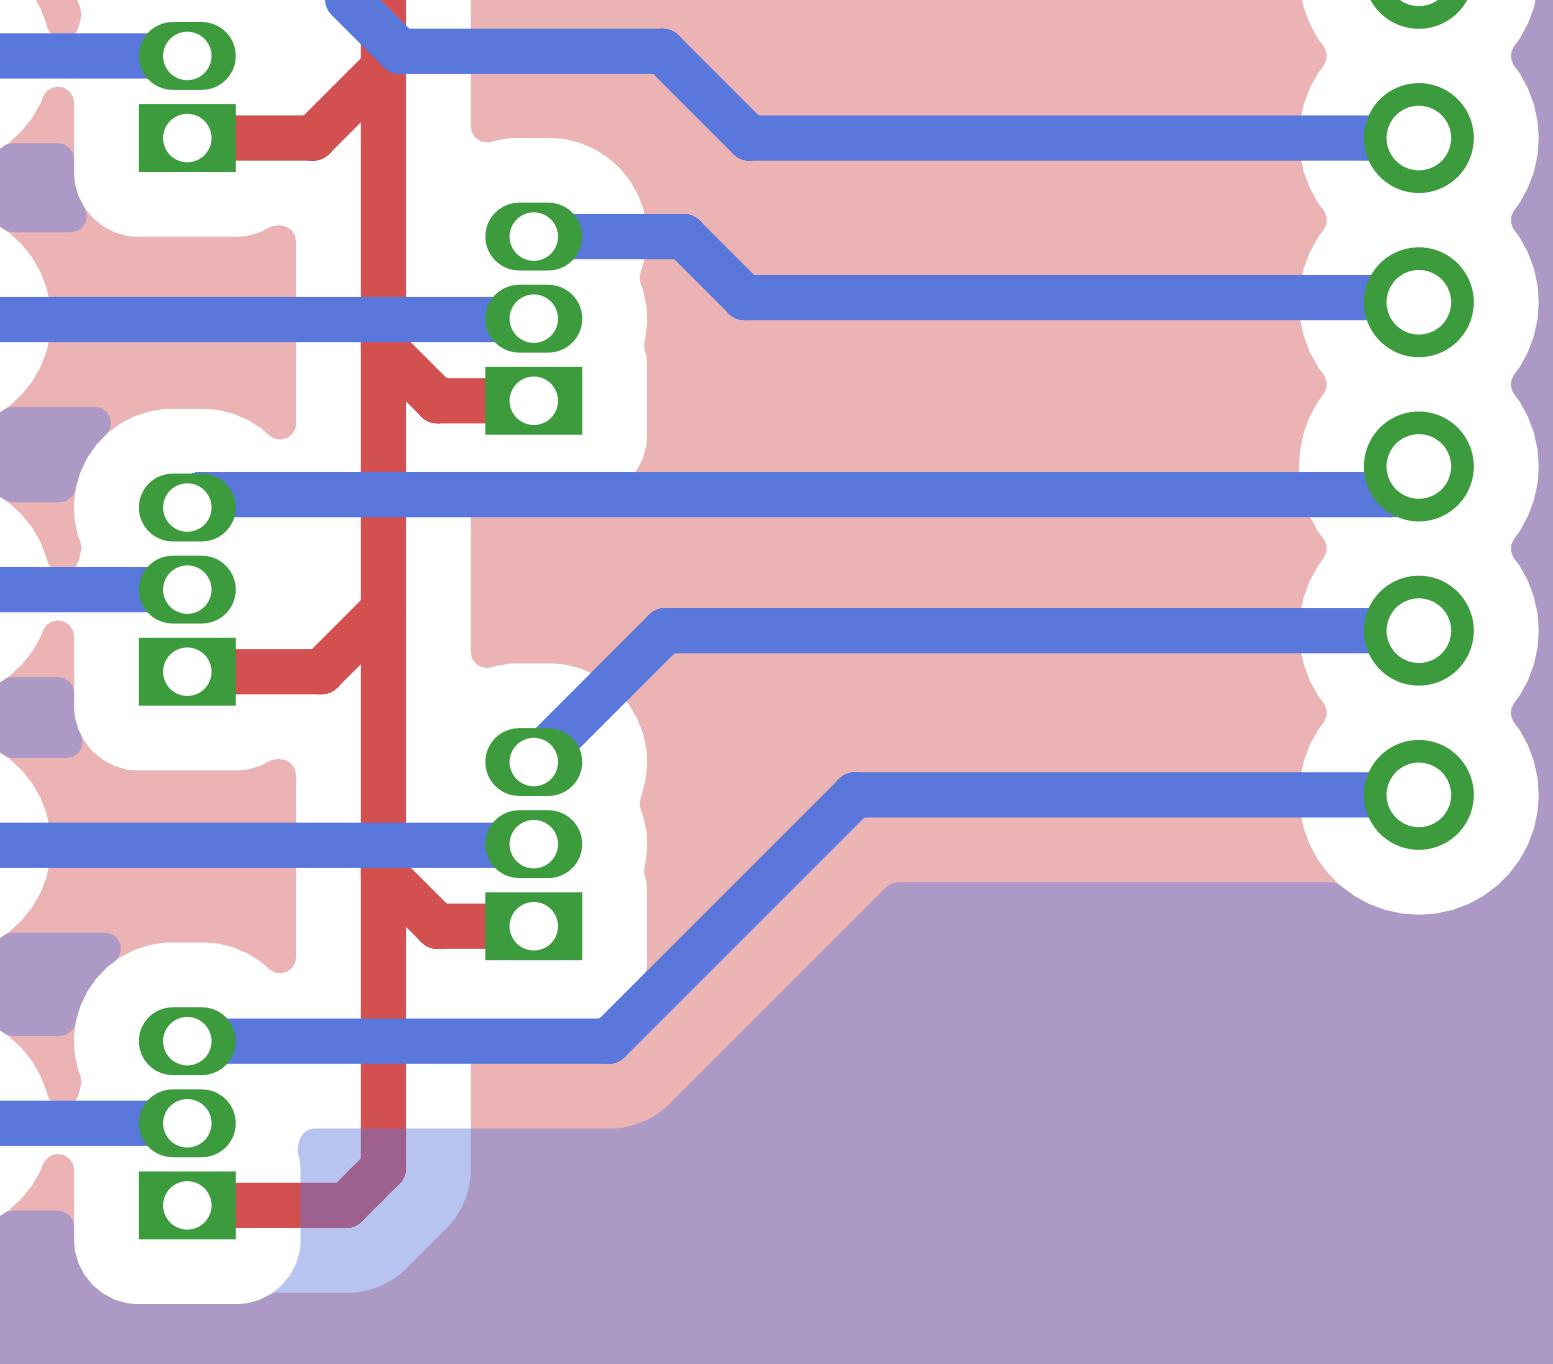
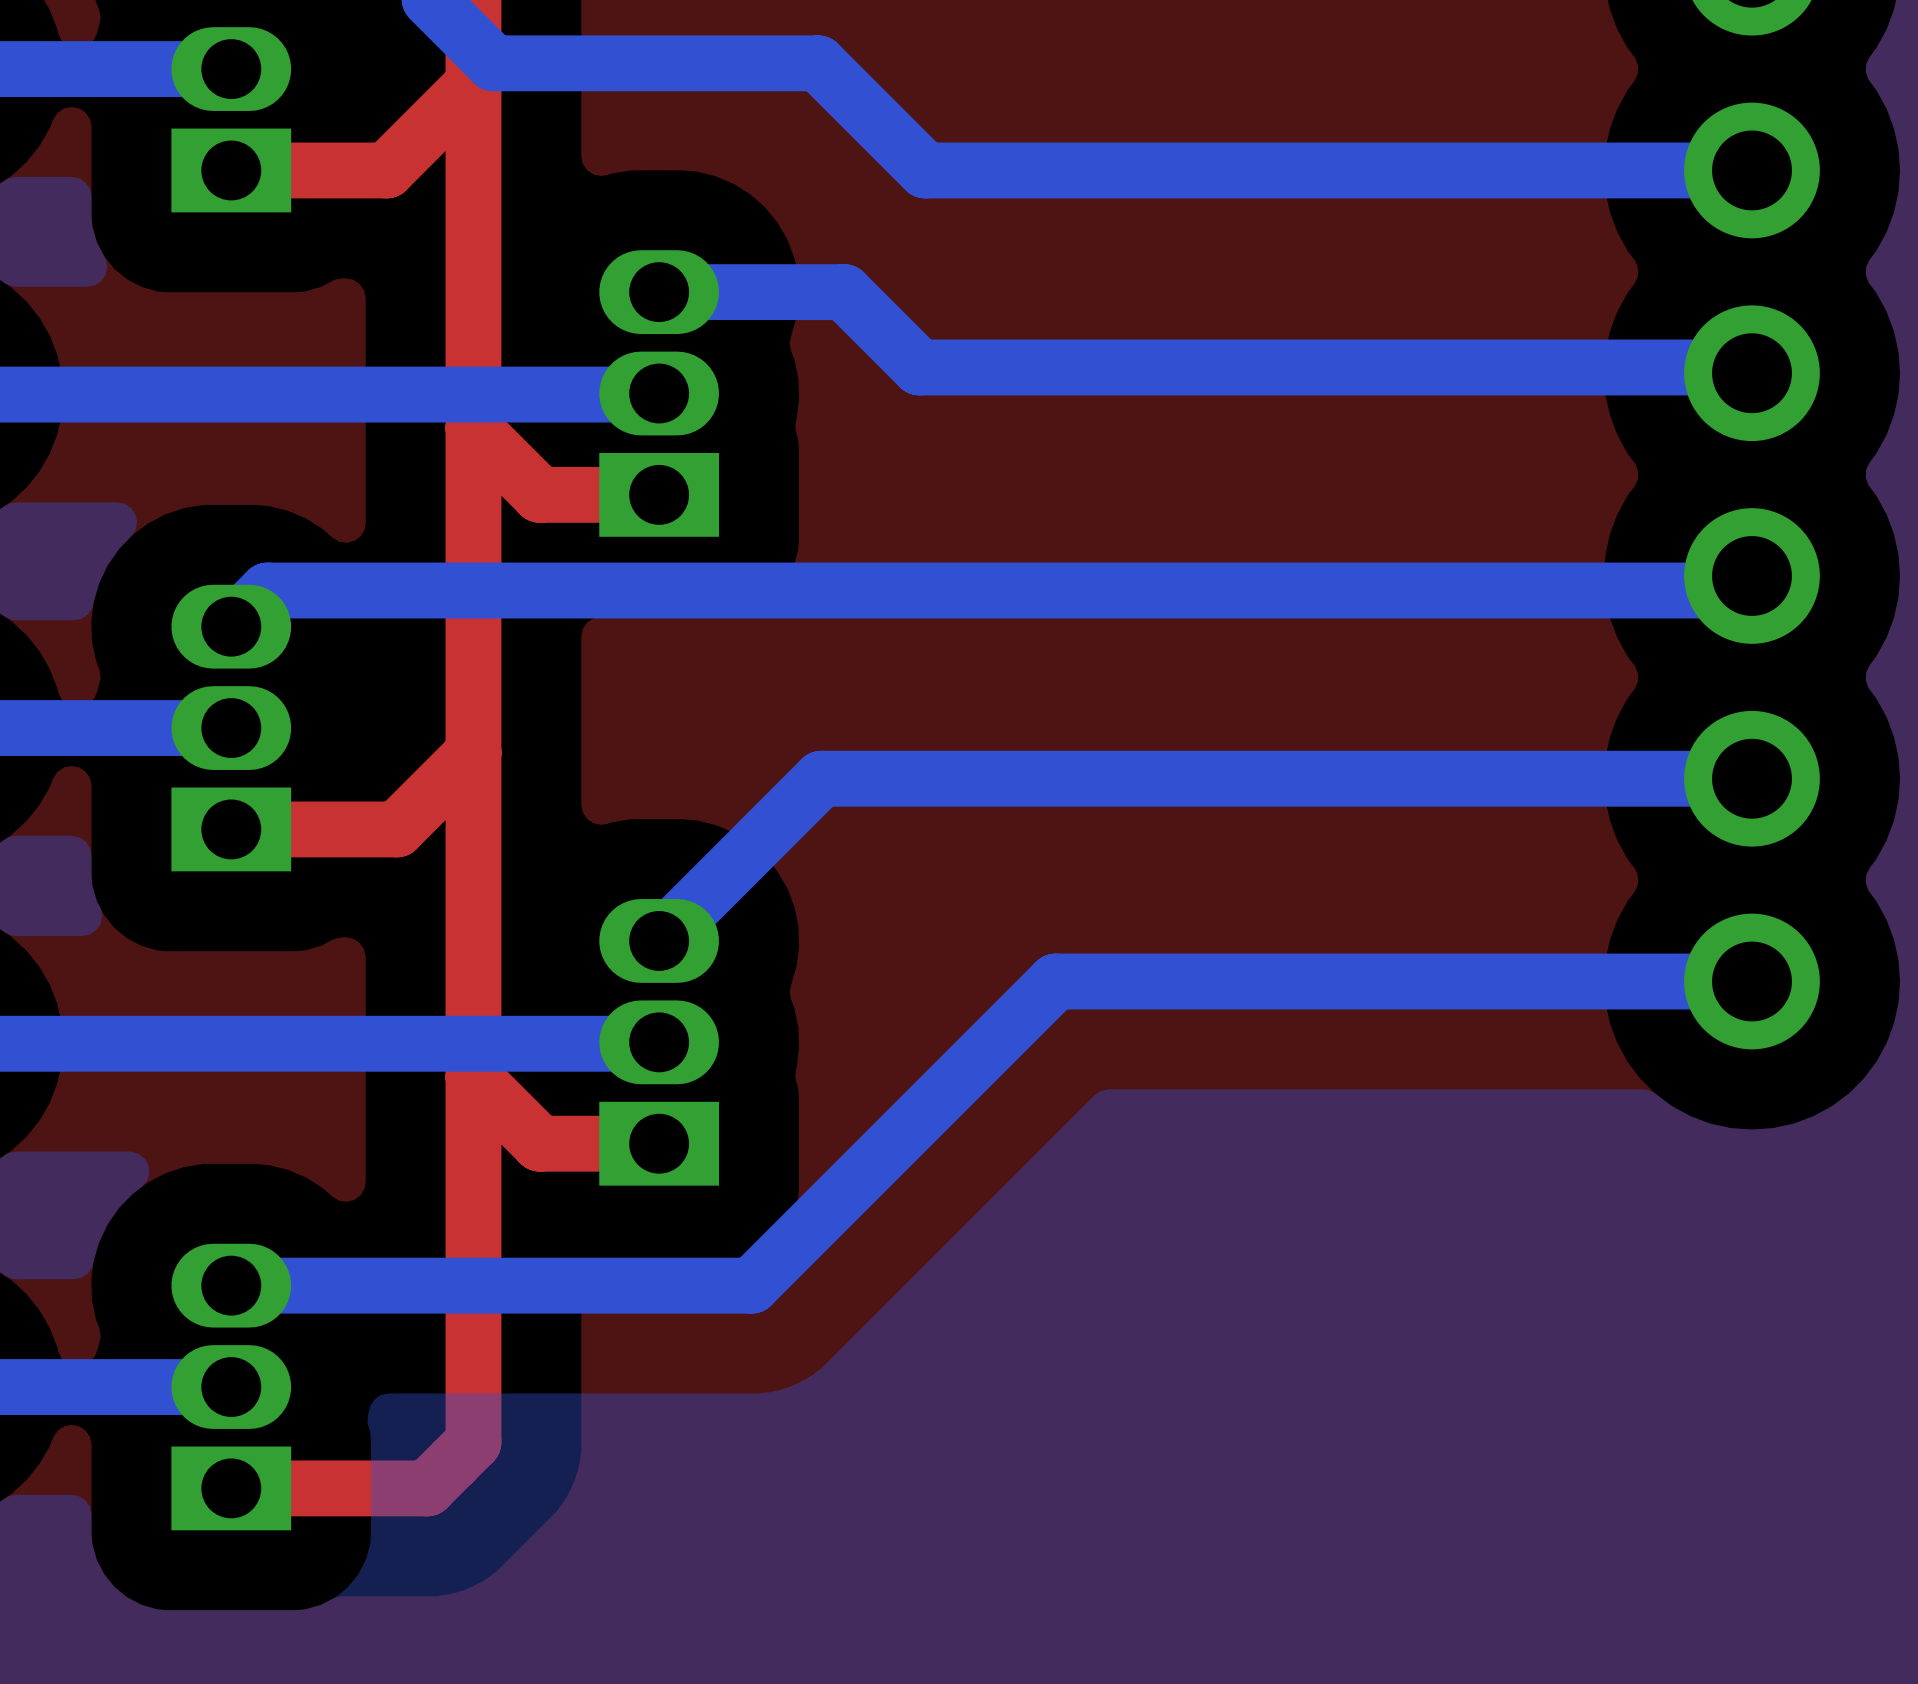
bottom track: (1407, 478) (1390, 494) (200, 494) -> (1737, 590) (267, 590) (247, 610)

